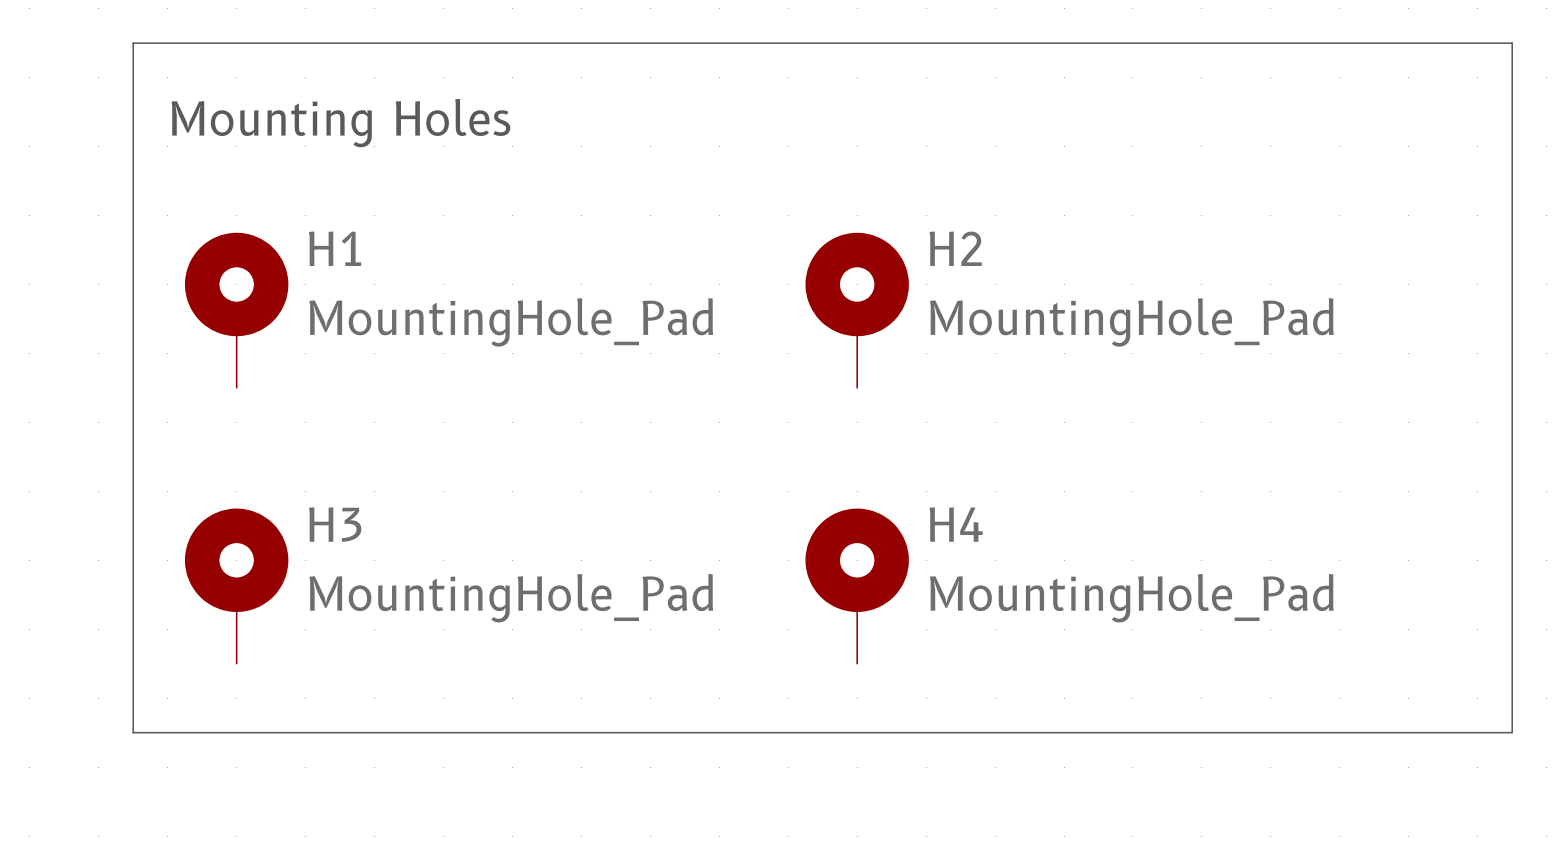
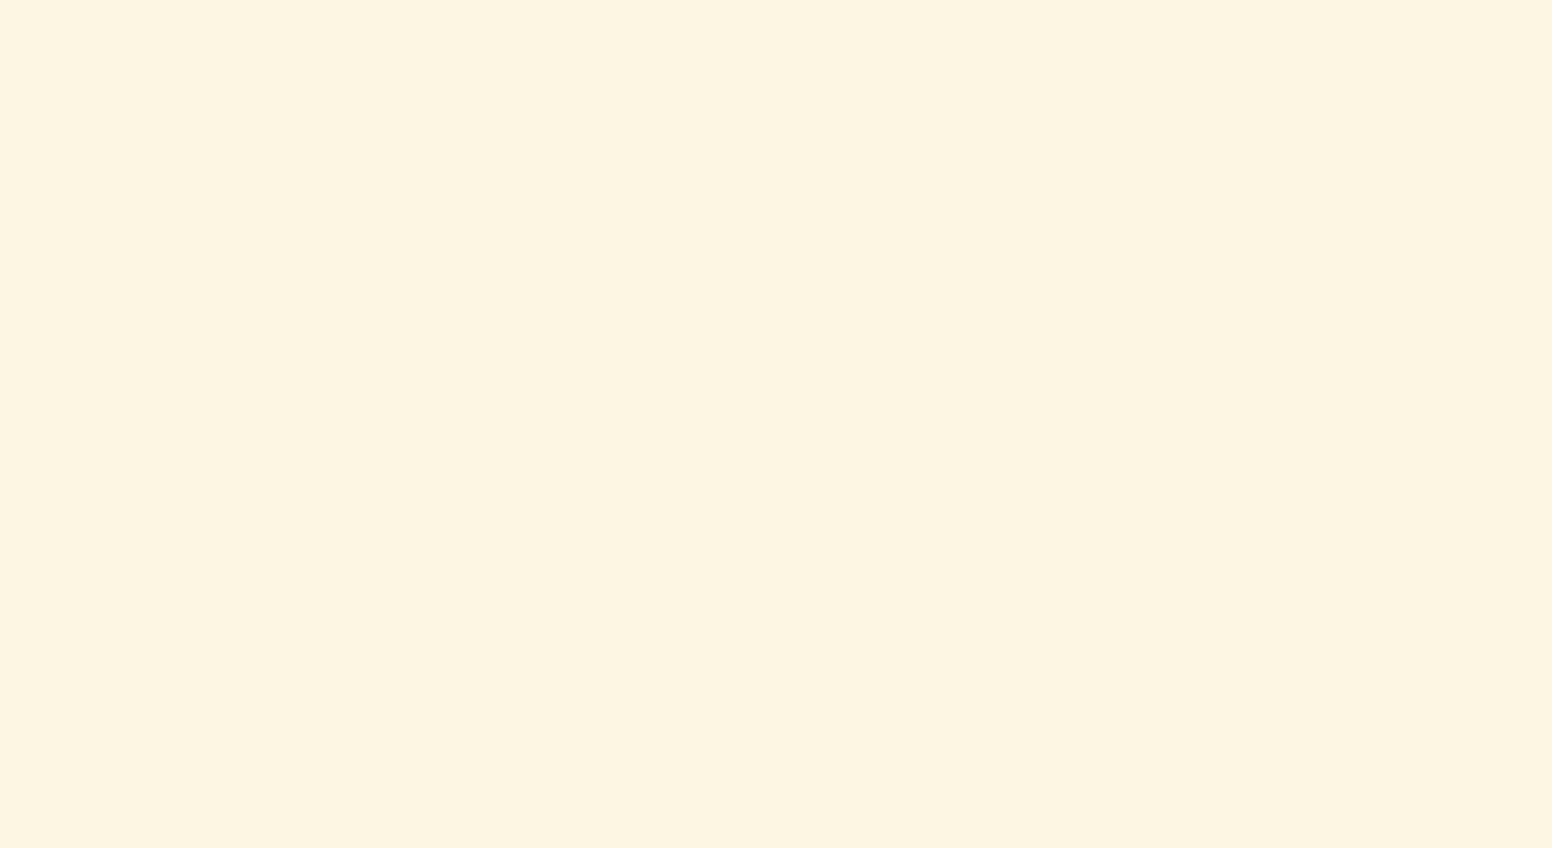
line: (133, 43) (1512, 43) (1512, 732) (133, 732) (133, 43) -> none
text: Mounting Holes (340, 123) -> none
H1: MountingHole_Pad (236, 310) -> none
H2: MountingHole_Pad (857, 310) -> none
H3: MountingHole_Pad (236, 586) -> none
H4: MountingHole_Pad (857, 586) -> none

